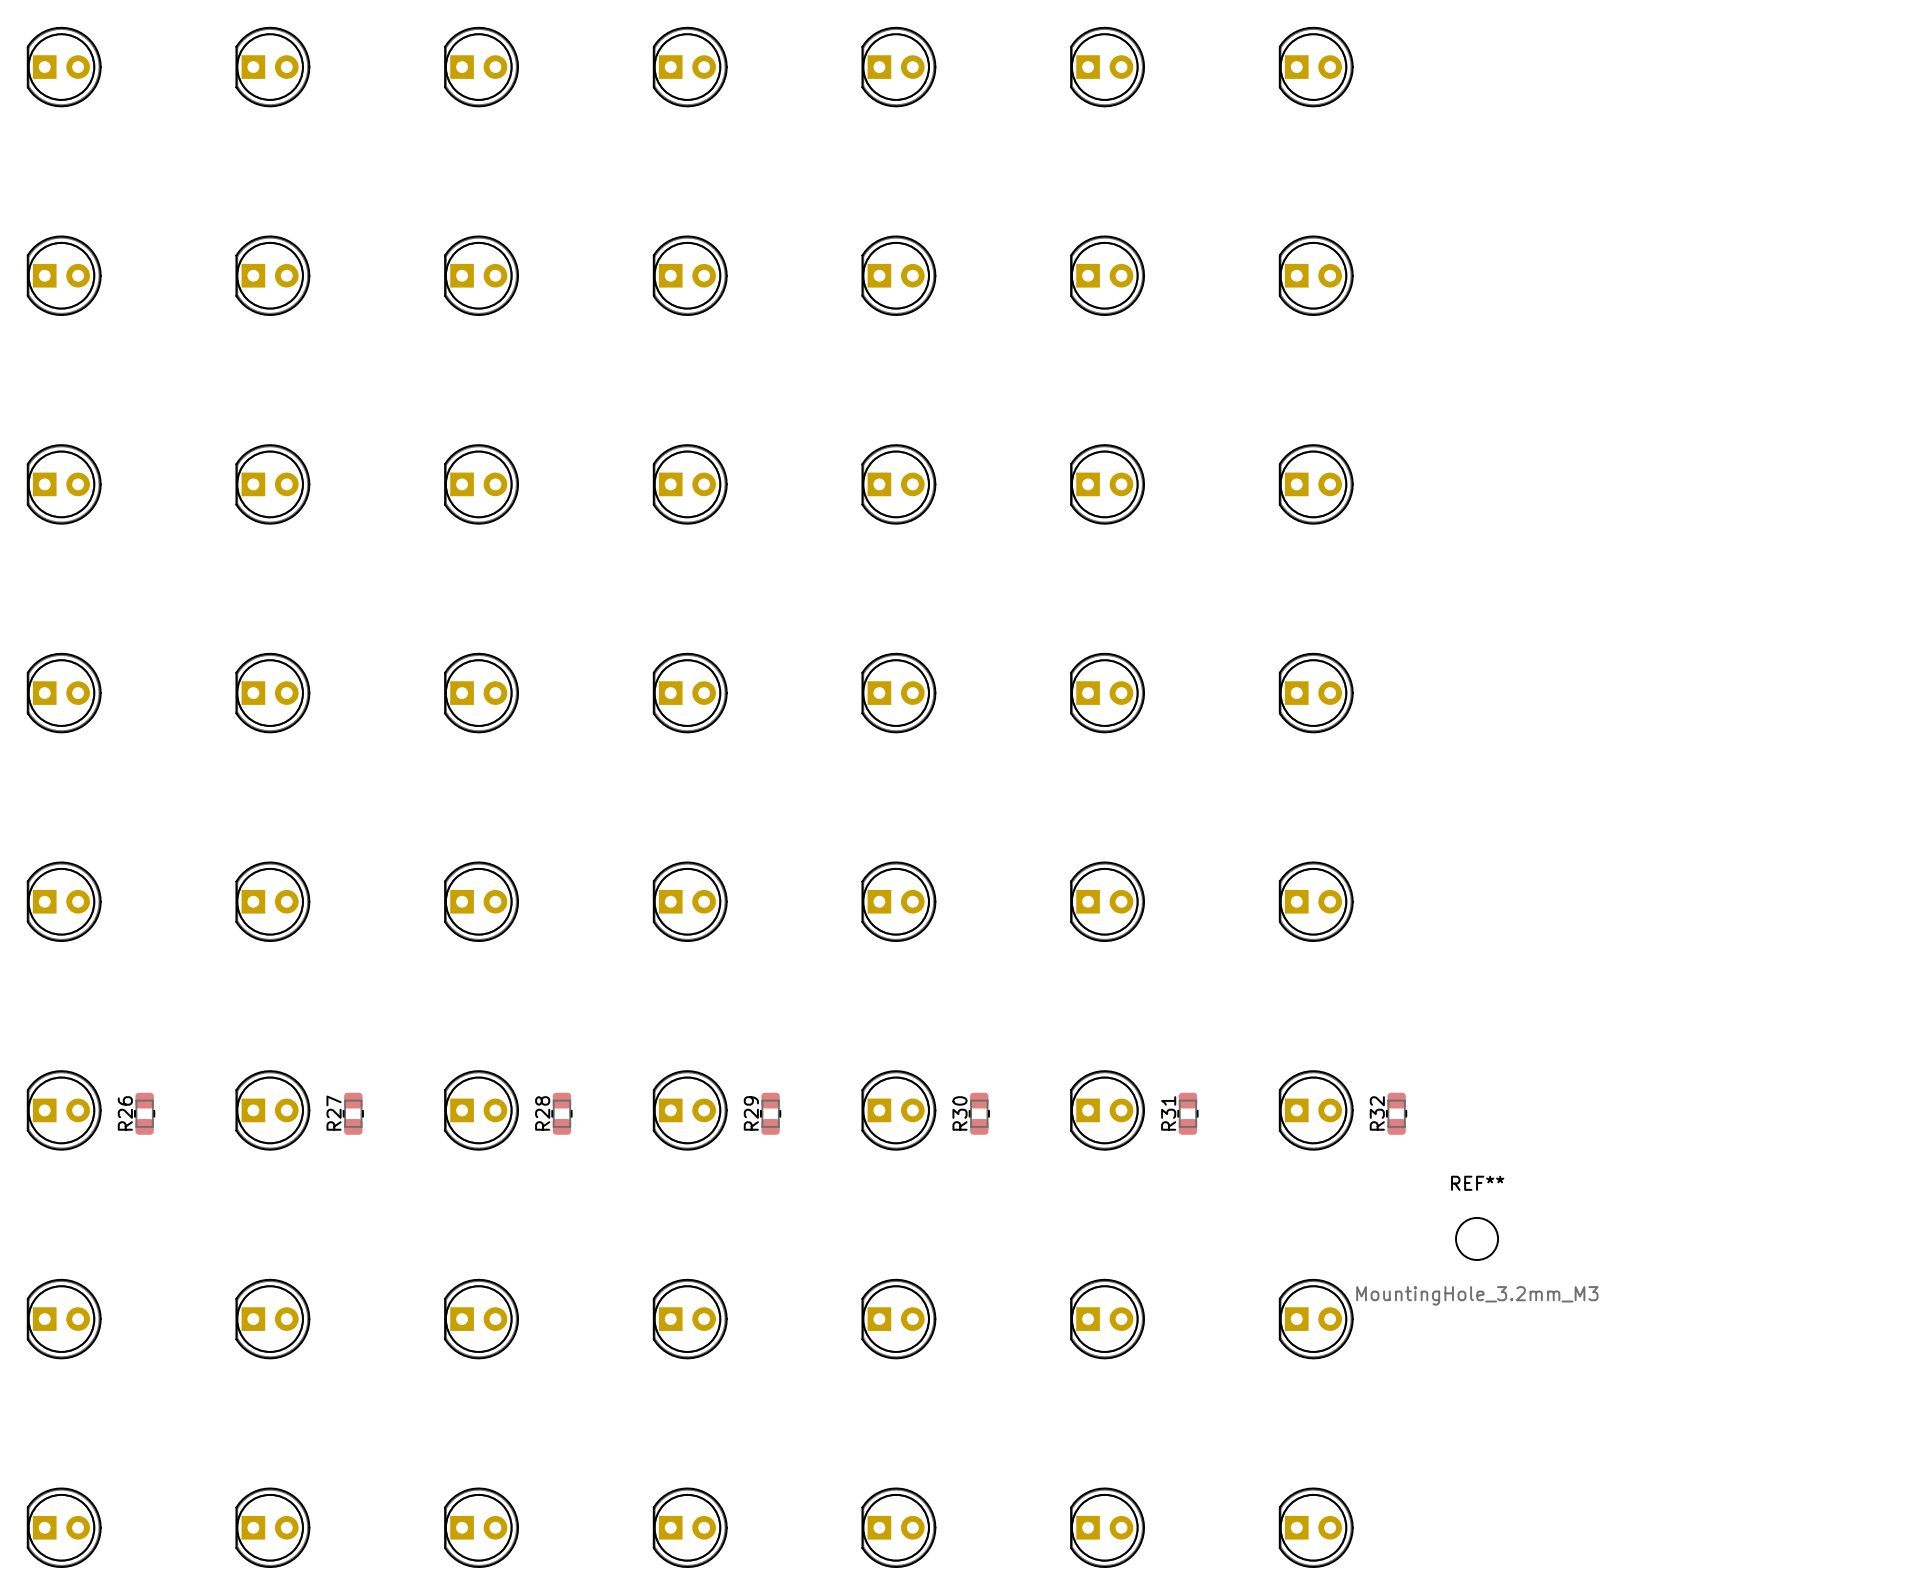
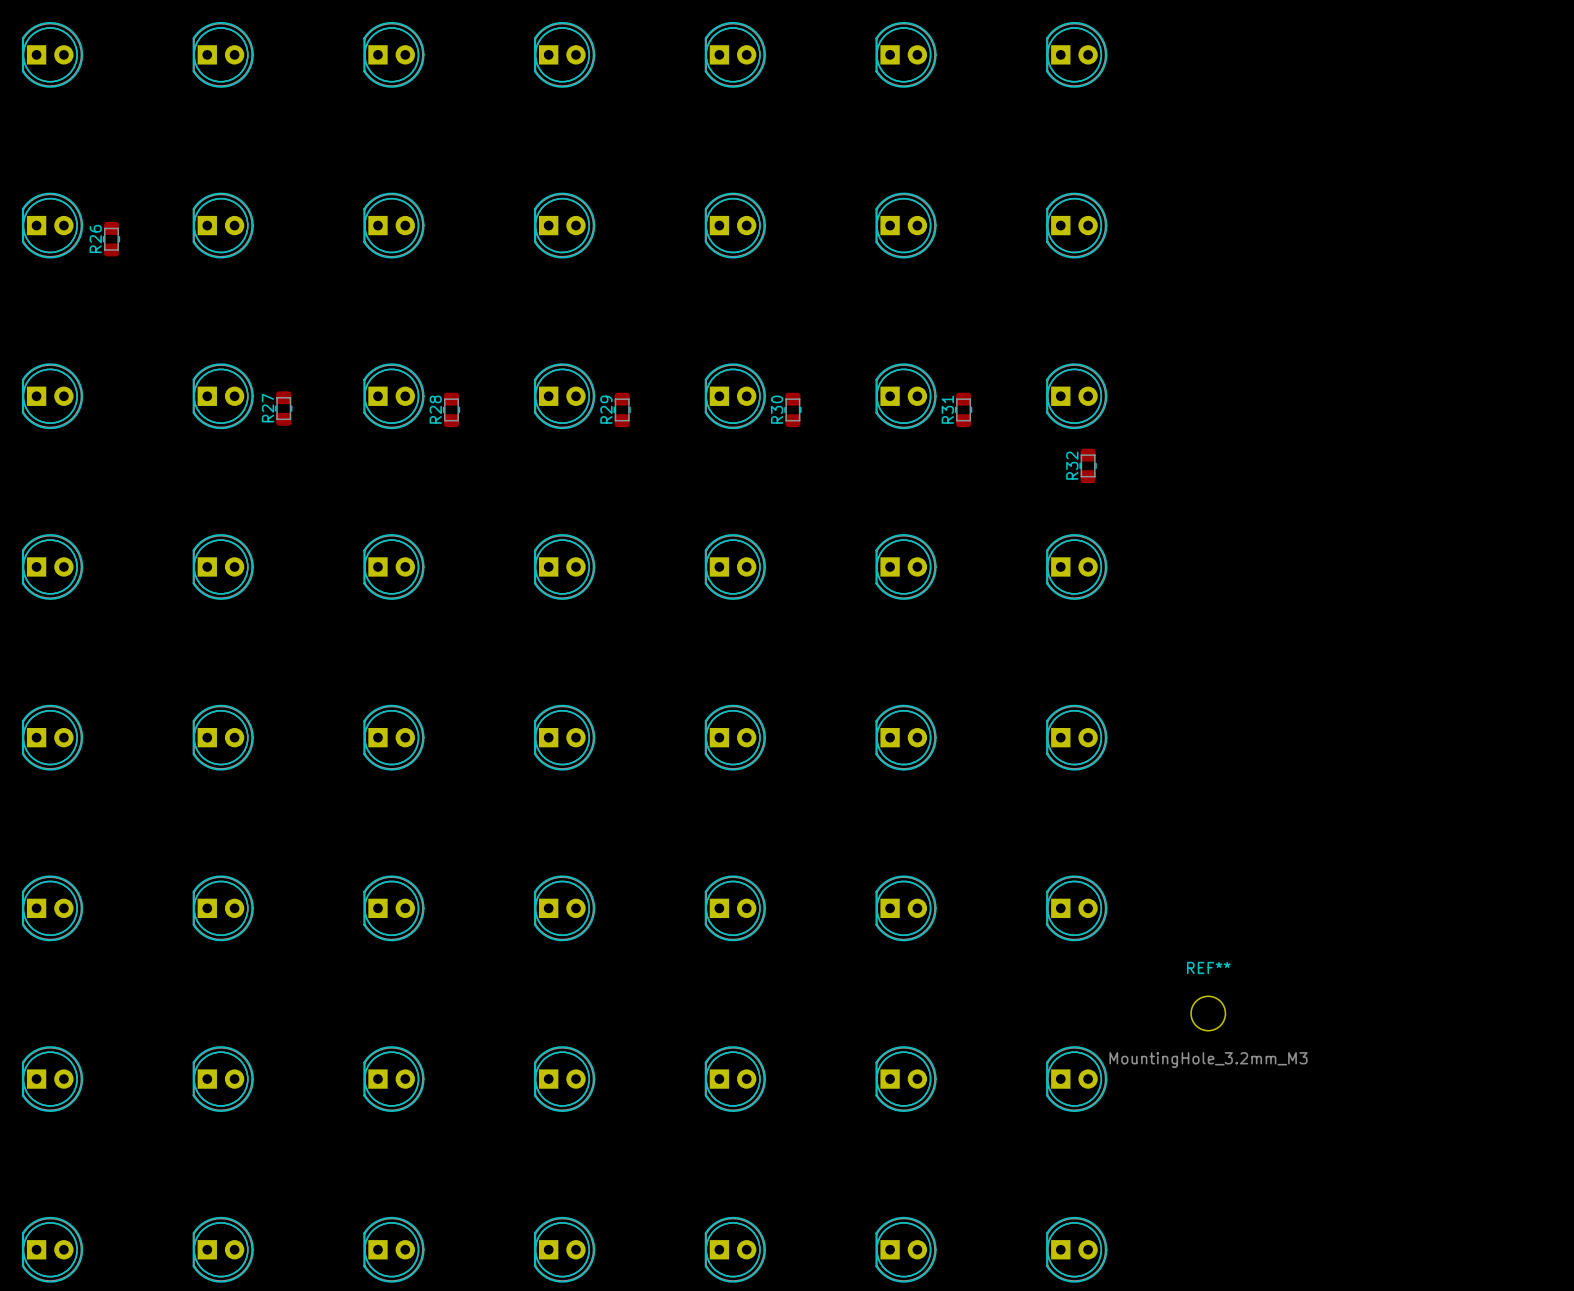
R26 position: (144, 1113) -> (111, 239)
R27 position: (353, 1113) -> (283, 408)
R28 position: (561, 1113) -> (451, 409)
R29 position: (770, 1113) -> (622, 409)
R30 position: (979, 1113) -> (792, 409)
R31 position: (1187, 1113) -> (963, 409)
R32 position: (1396, 1113) -> (1088, 465)

